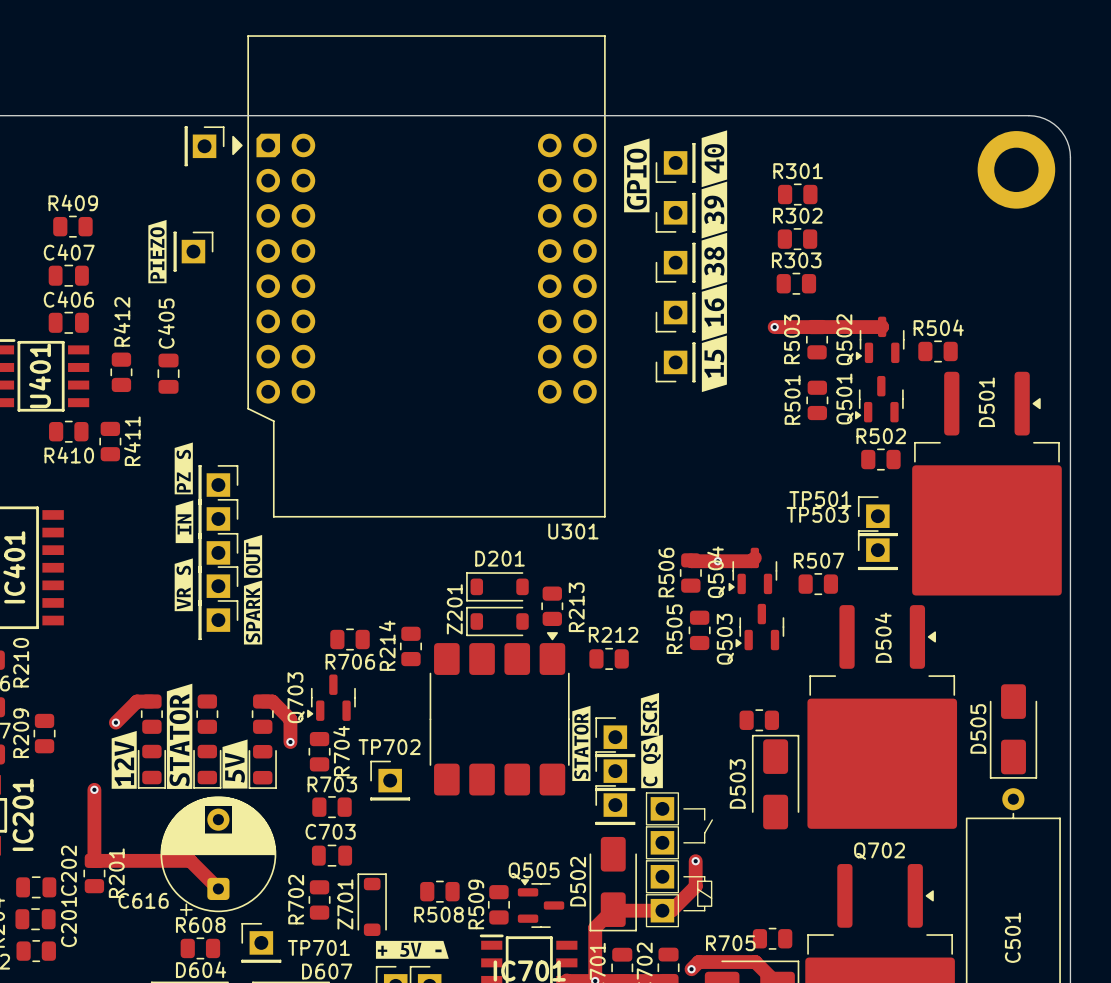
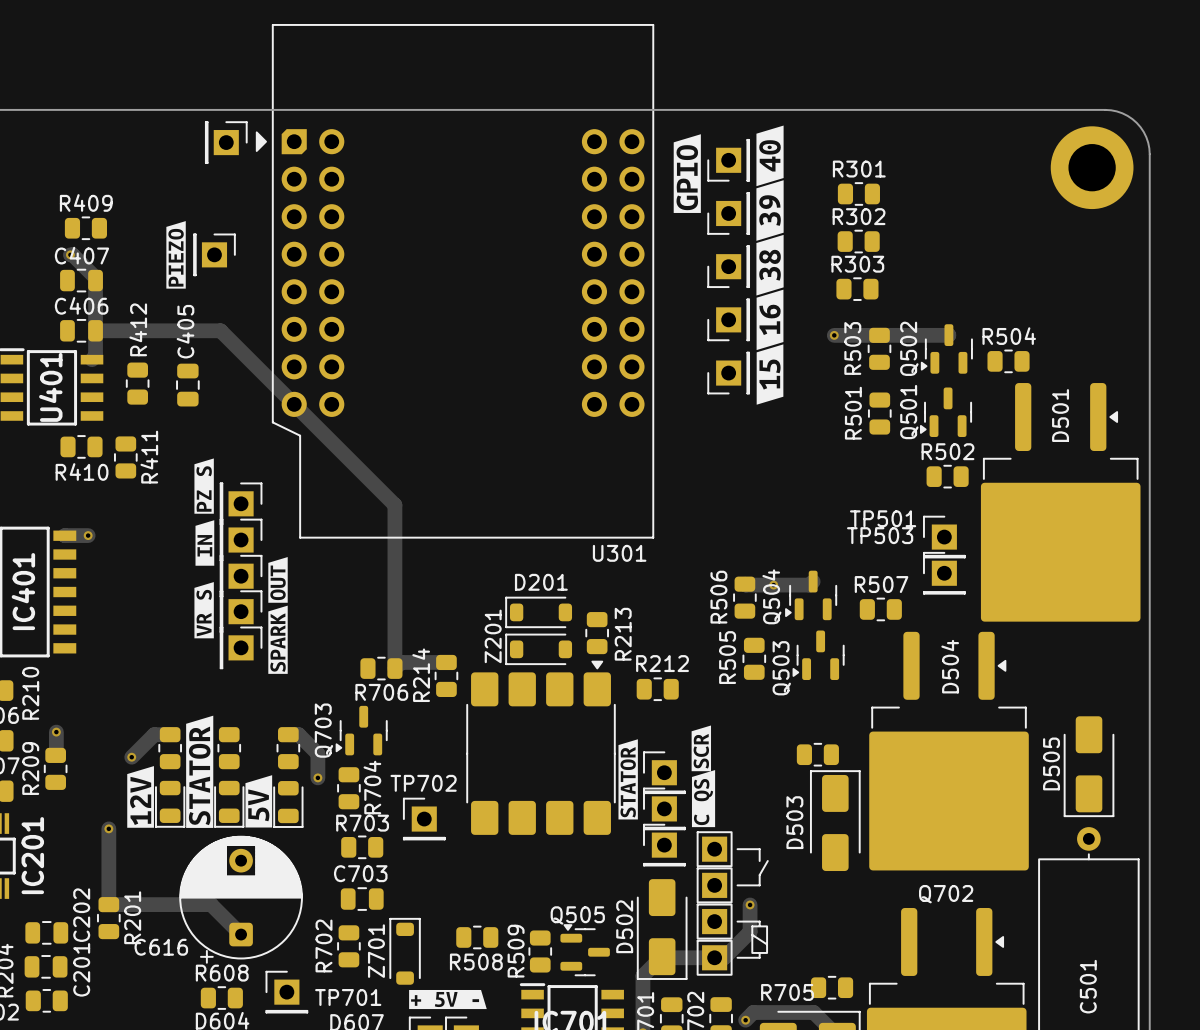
track: none -> (70, 254) (95, 277) (95, 356) (92, 359)
via: none -> (70, 254)
track: none -> (95, 330) (220, 330) (394, 505) (394, 668) (401, 662) (446, 662)
track: none -> (64, 535) (88, 535)
via: none -> (88, 535)
track: none -> (56, 732) (55, 755)
via: none -> (56, 732)

